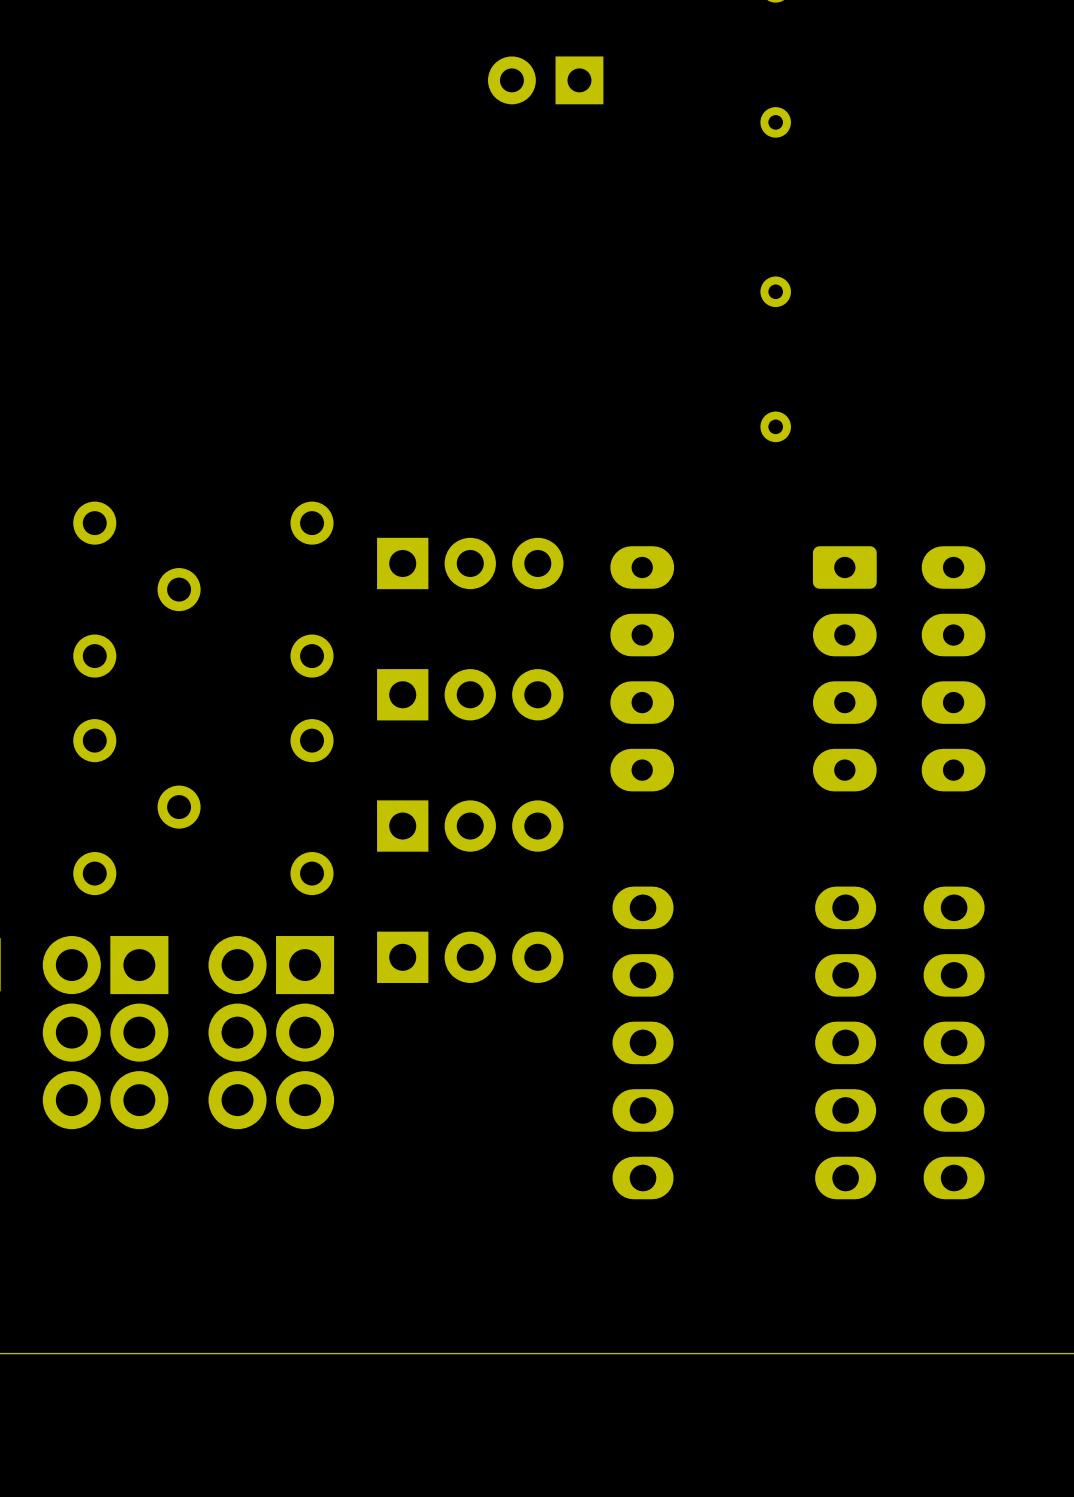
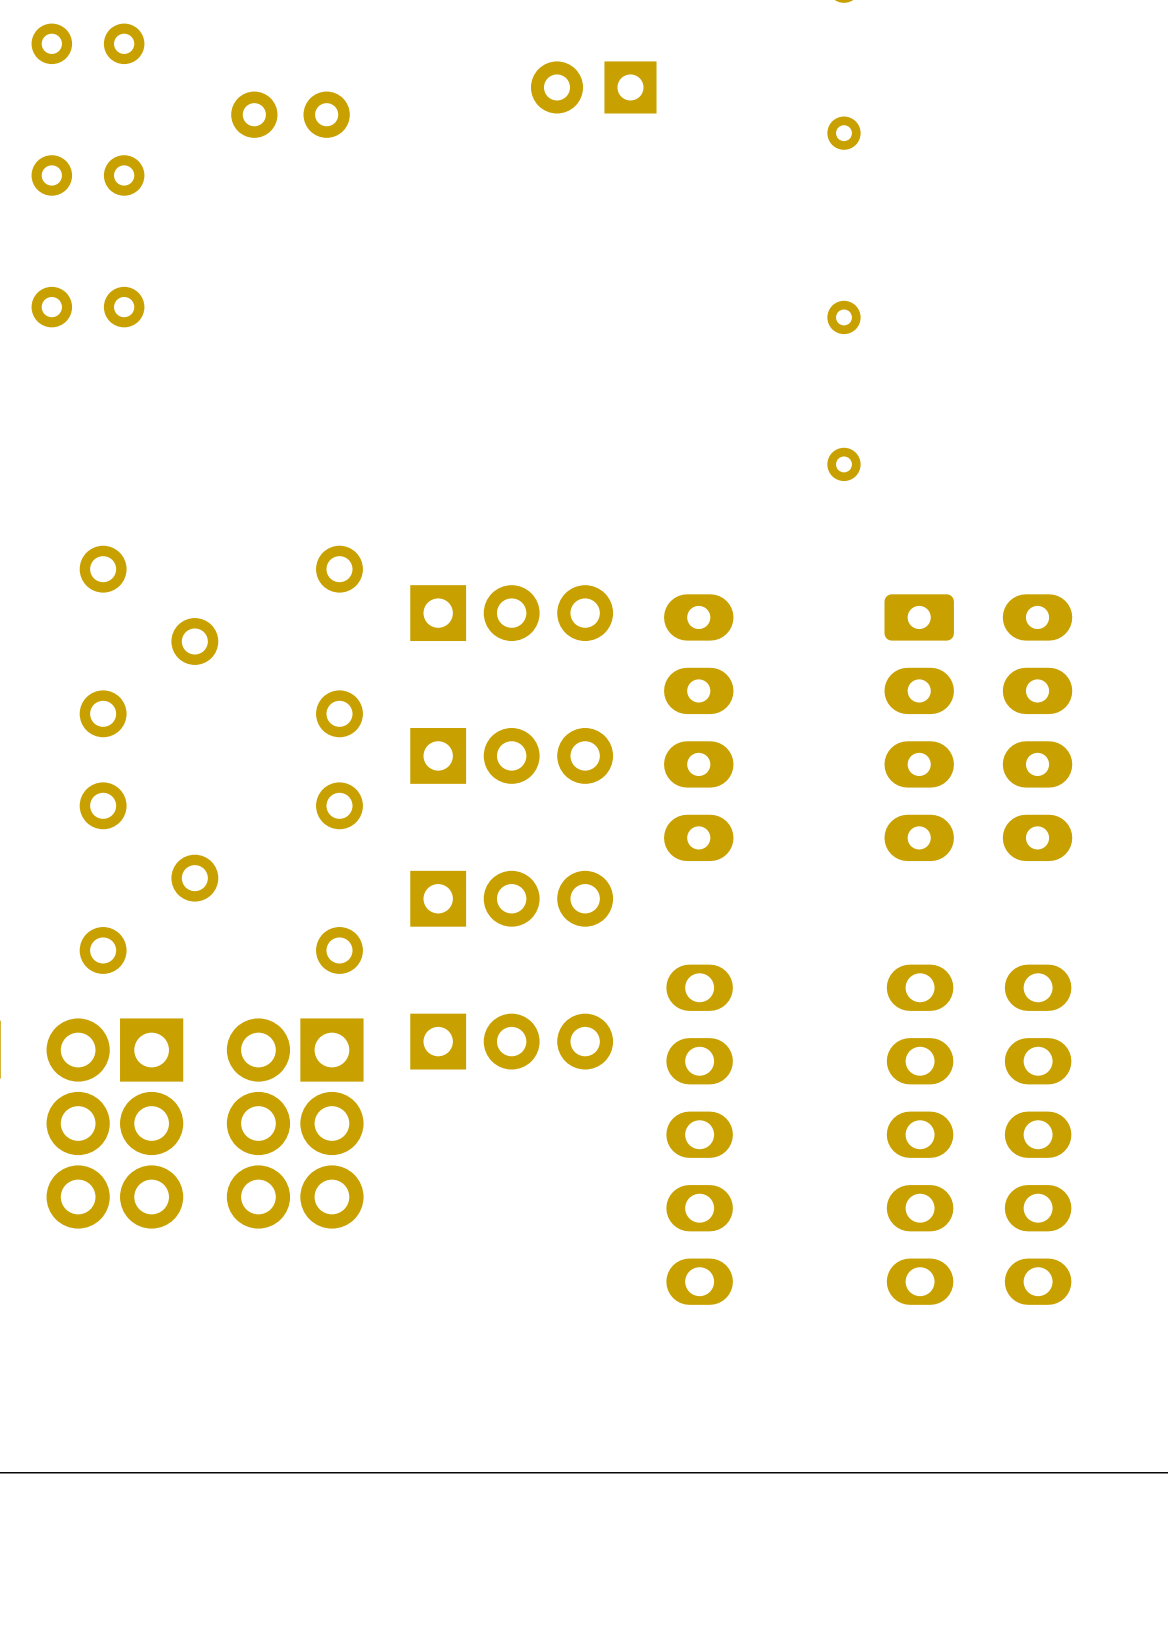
part: none -> (87, 43)
part: none -> (290, 114)
part: none -> (87, 175)
part: none -> (87, 307)

